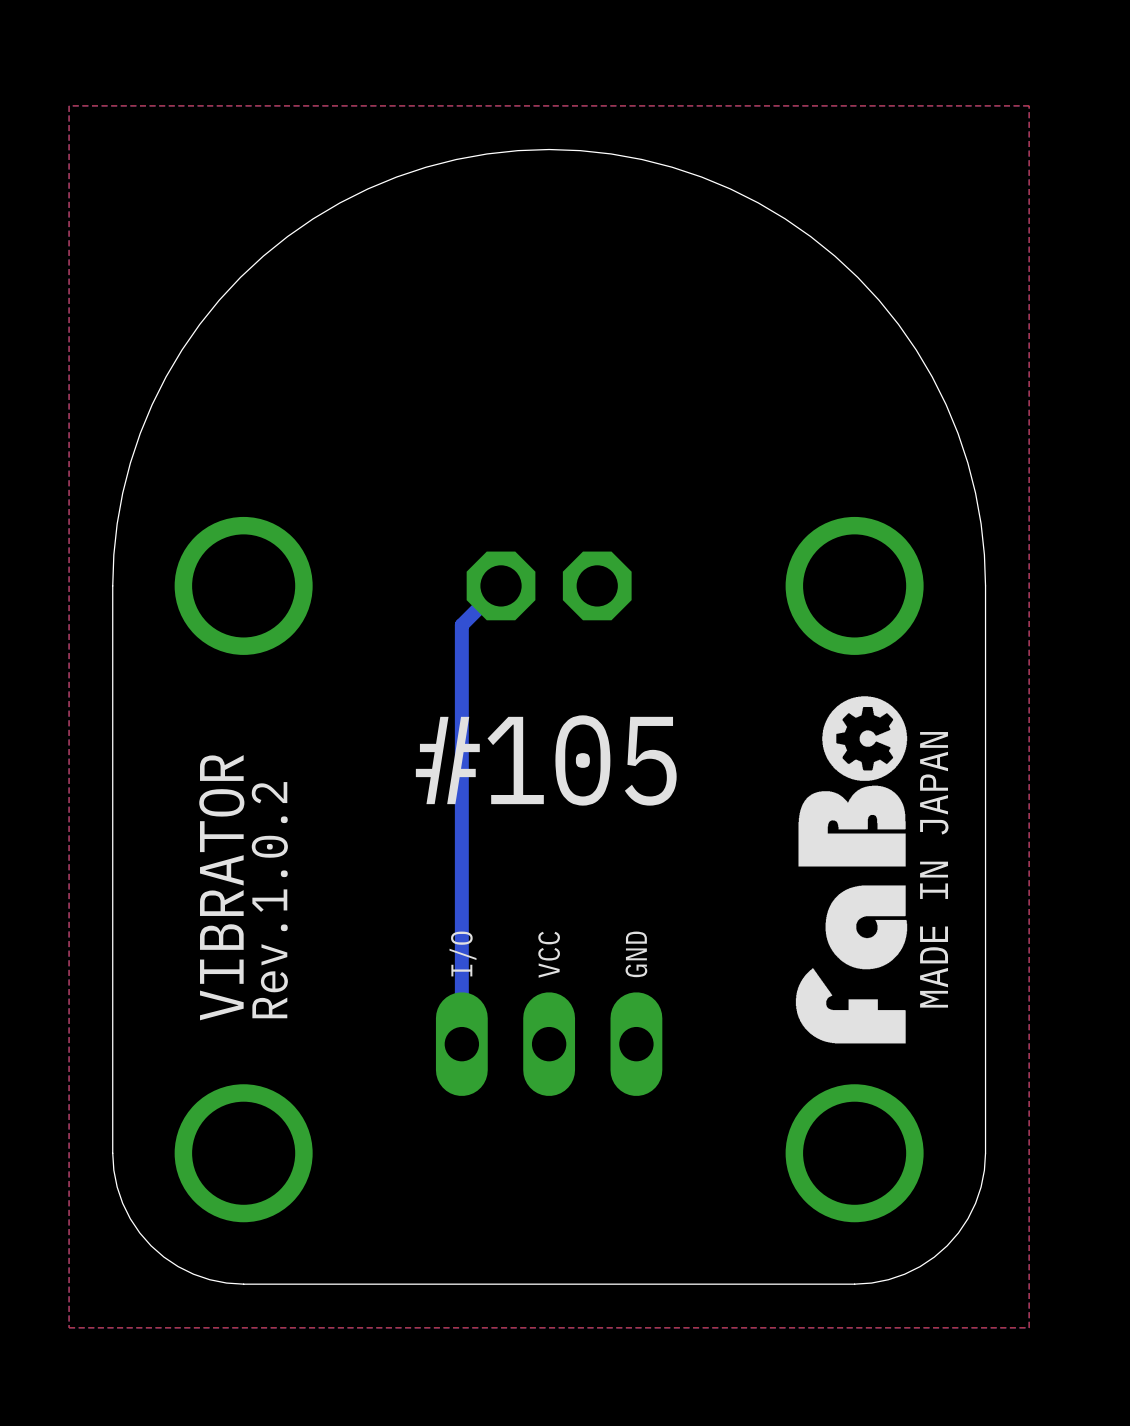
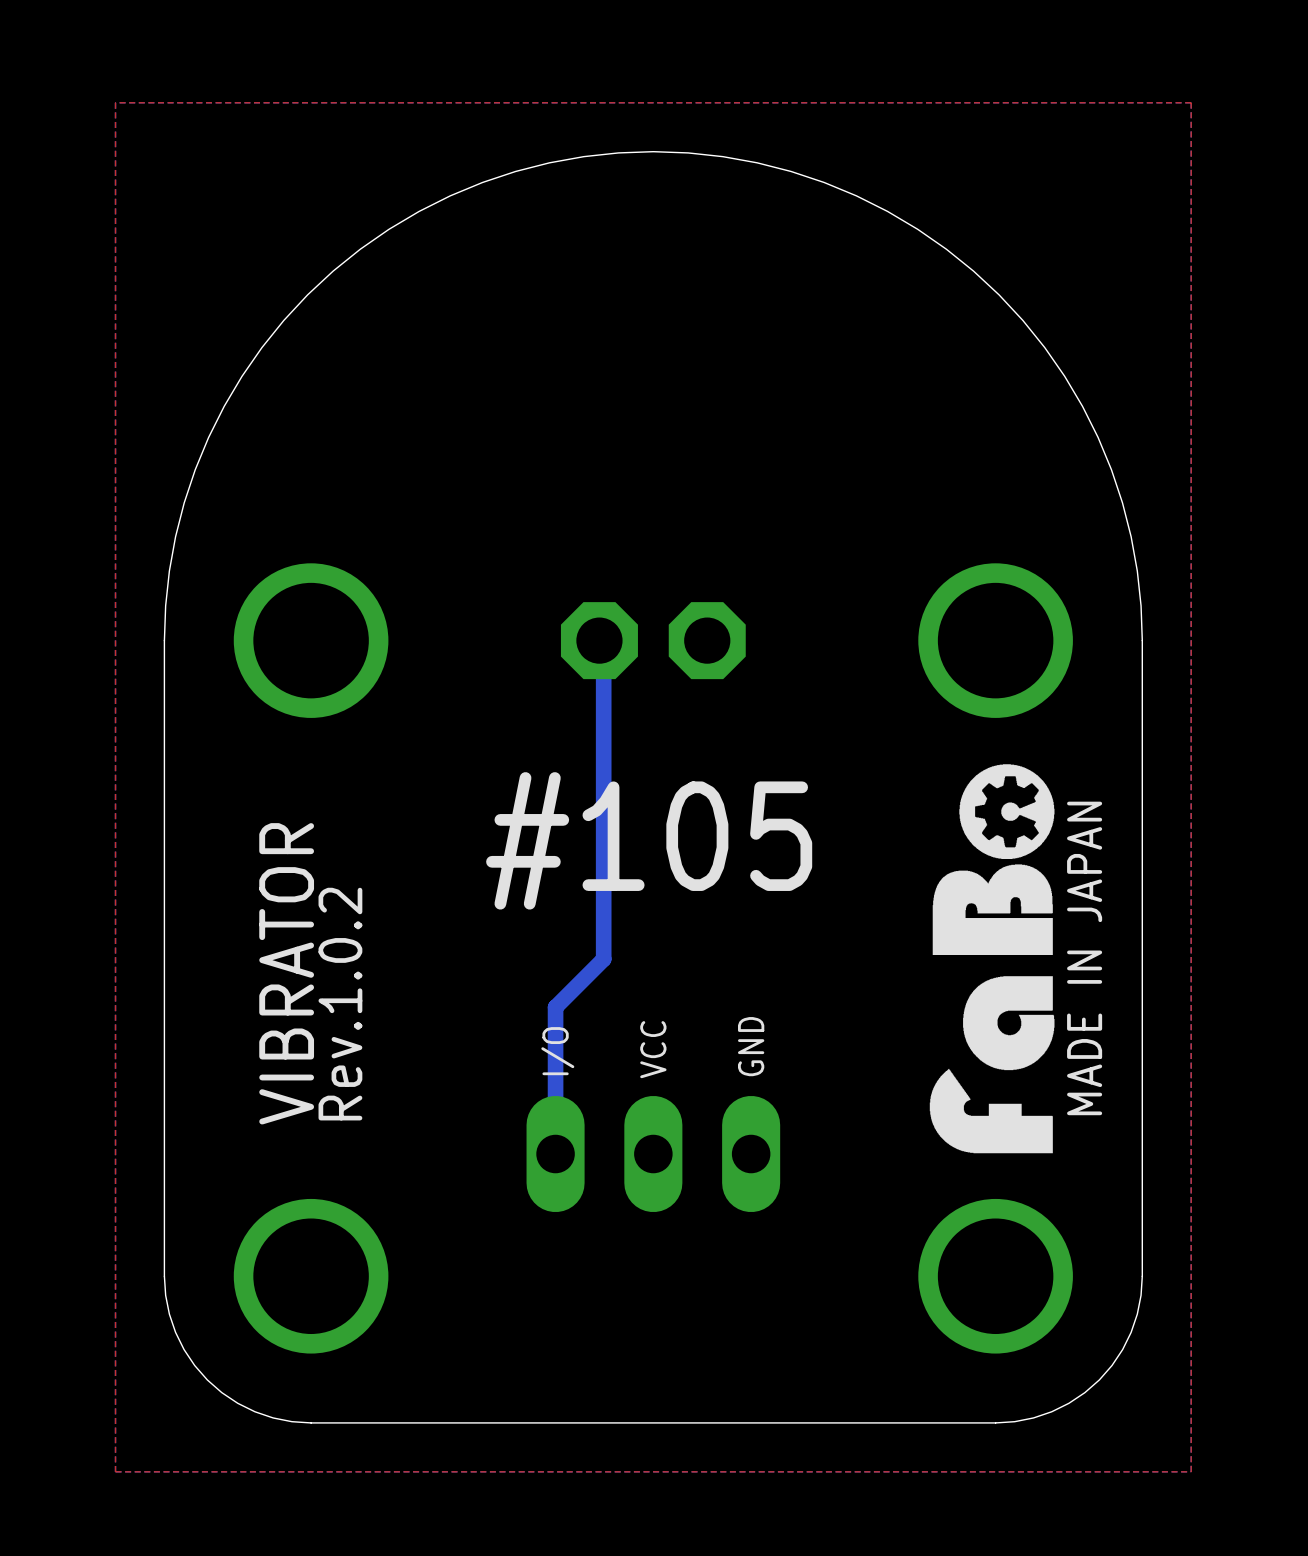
bottom track: (501, 585) (461, 625) (461, 913) -> (603, 640) (603, 959) (555, 1007)

